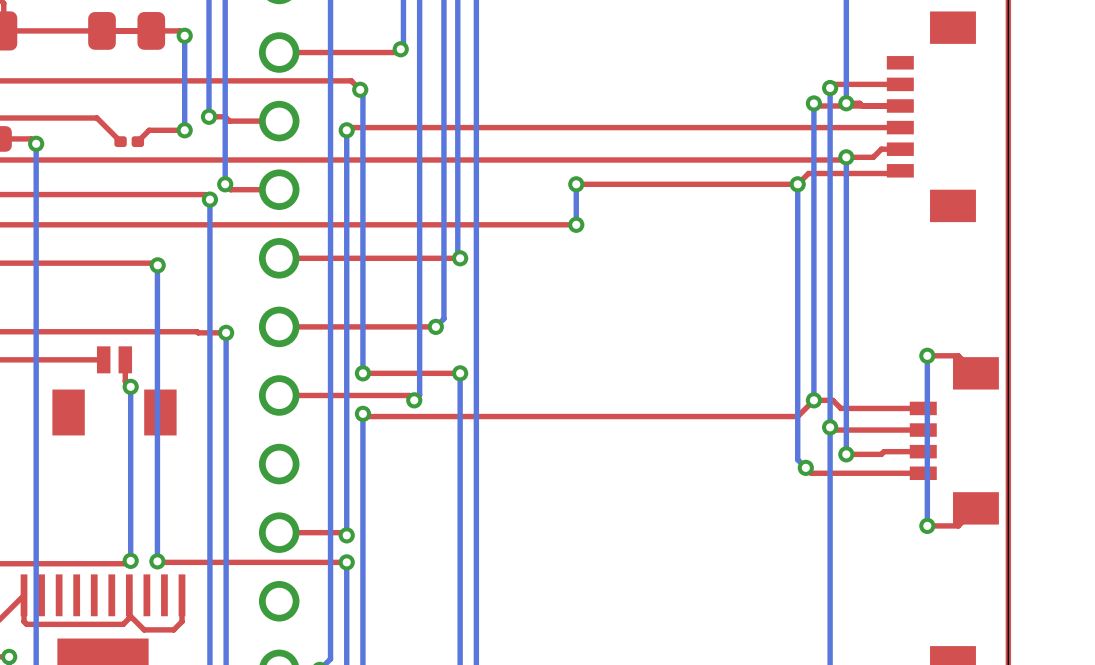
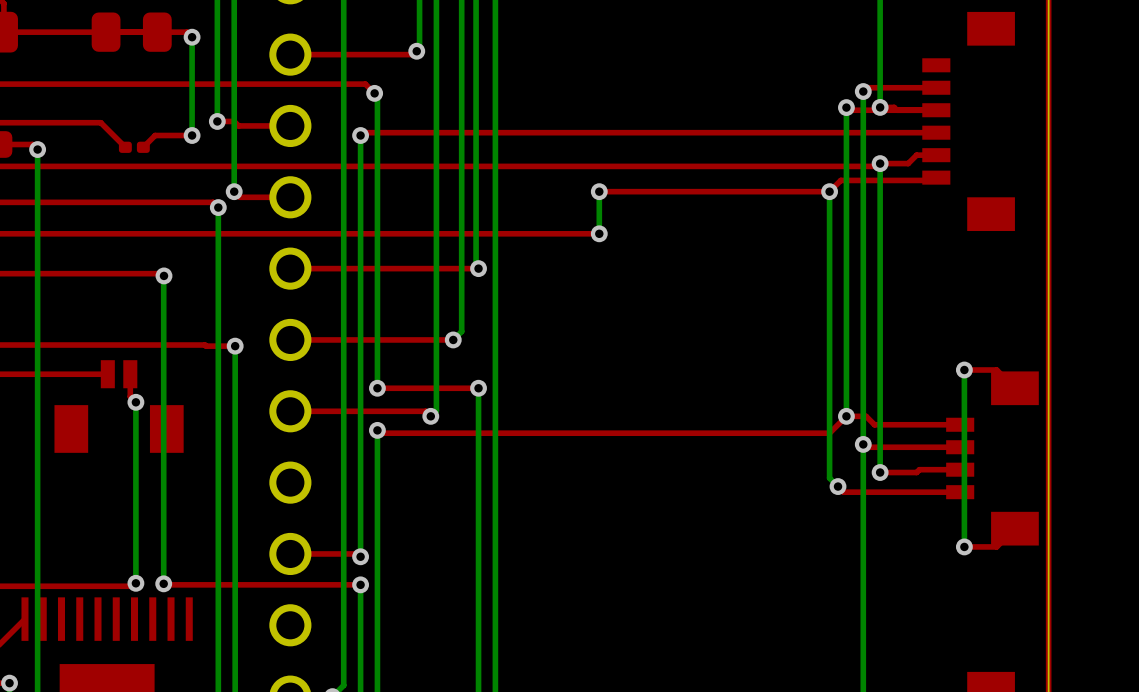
top track: (129, 595) (129, 618) (123, 624) (26, 624) (24, 621) (24, 595) -> none
top track: (182, 595) (182, 621) (173, 629) (144, 629) (129, 615) -> none

